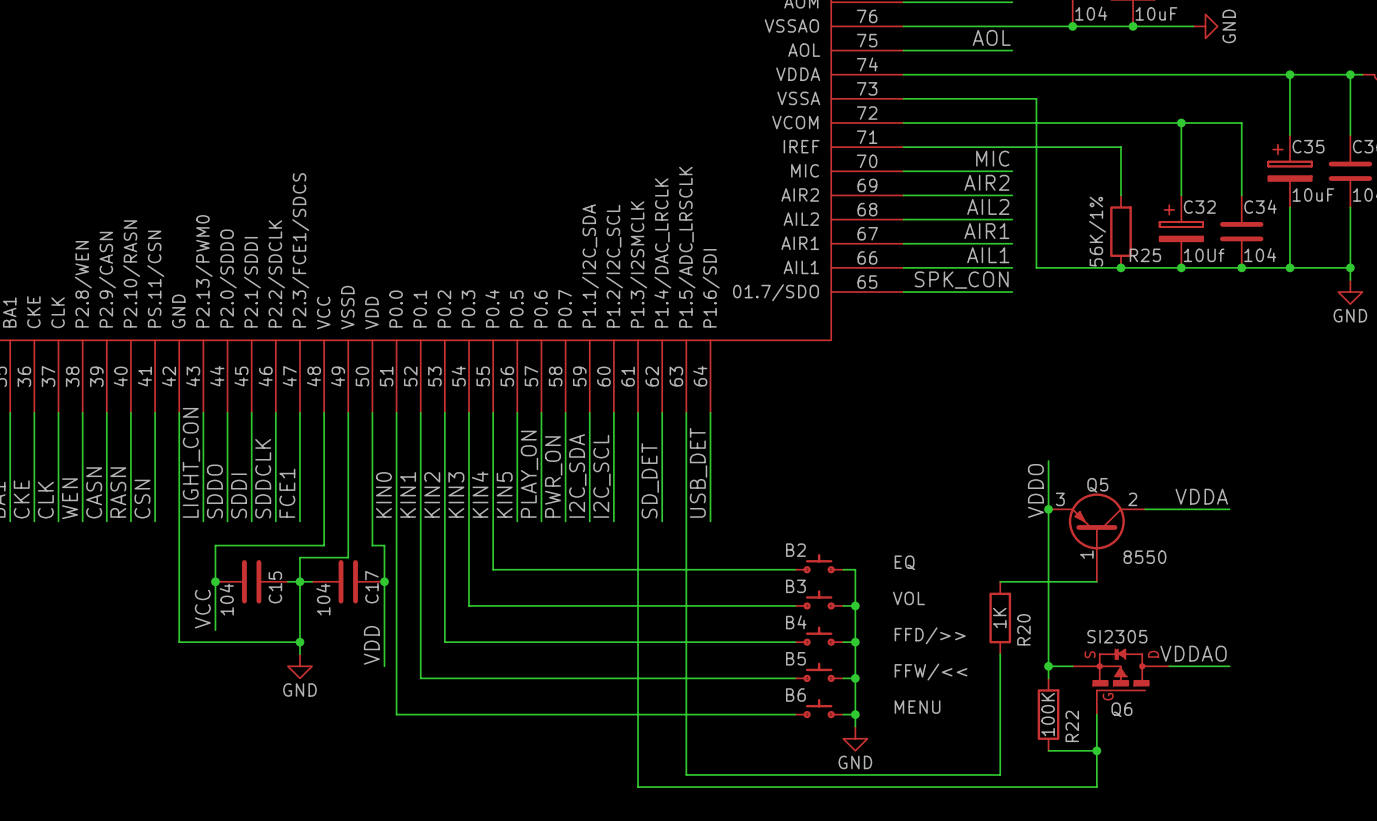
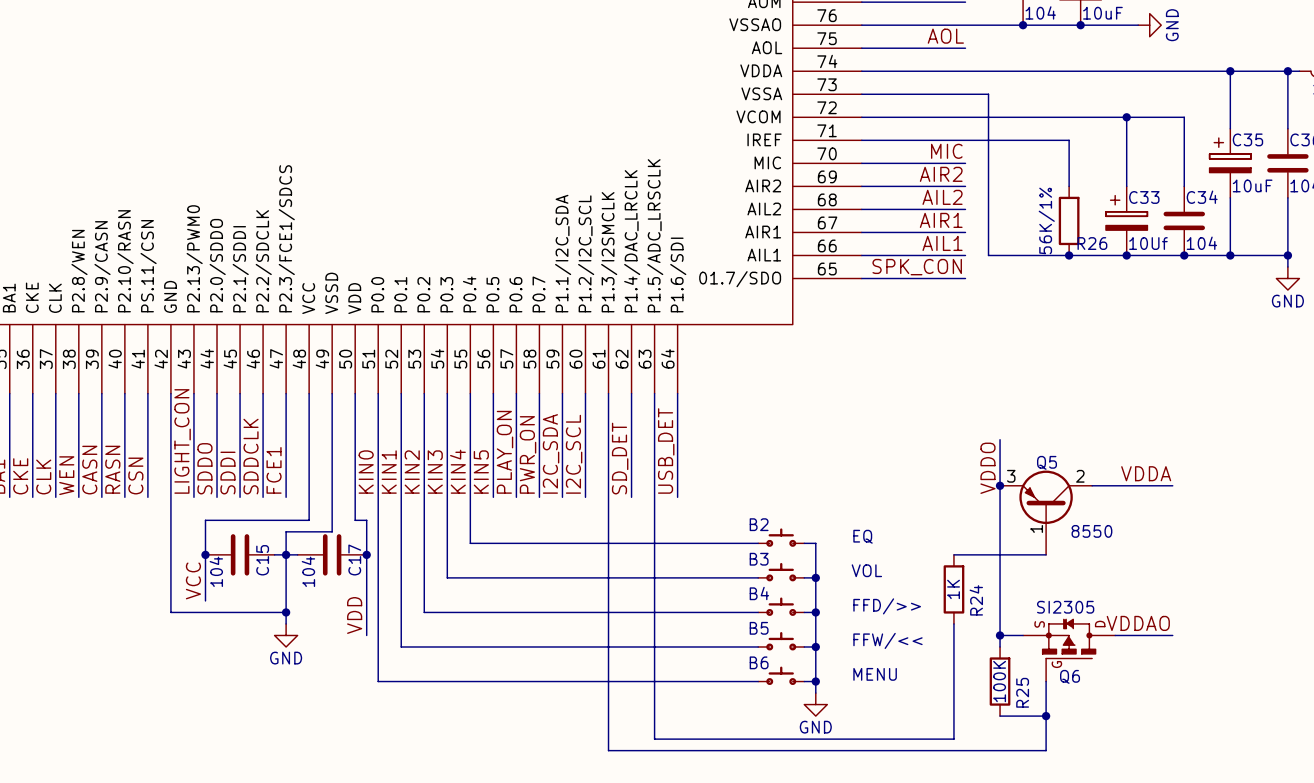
C32 name: C32 (1199, 207) -> C33 (1144, 197)
R25 name: R25 (1145, 255) -> R26 (1092, 243)
R20 name: R20 (1023, 629) -> R24 (976, 600)
R22 name: R22 (1072, 726) -> R25 (1022, 692)

